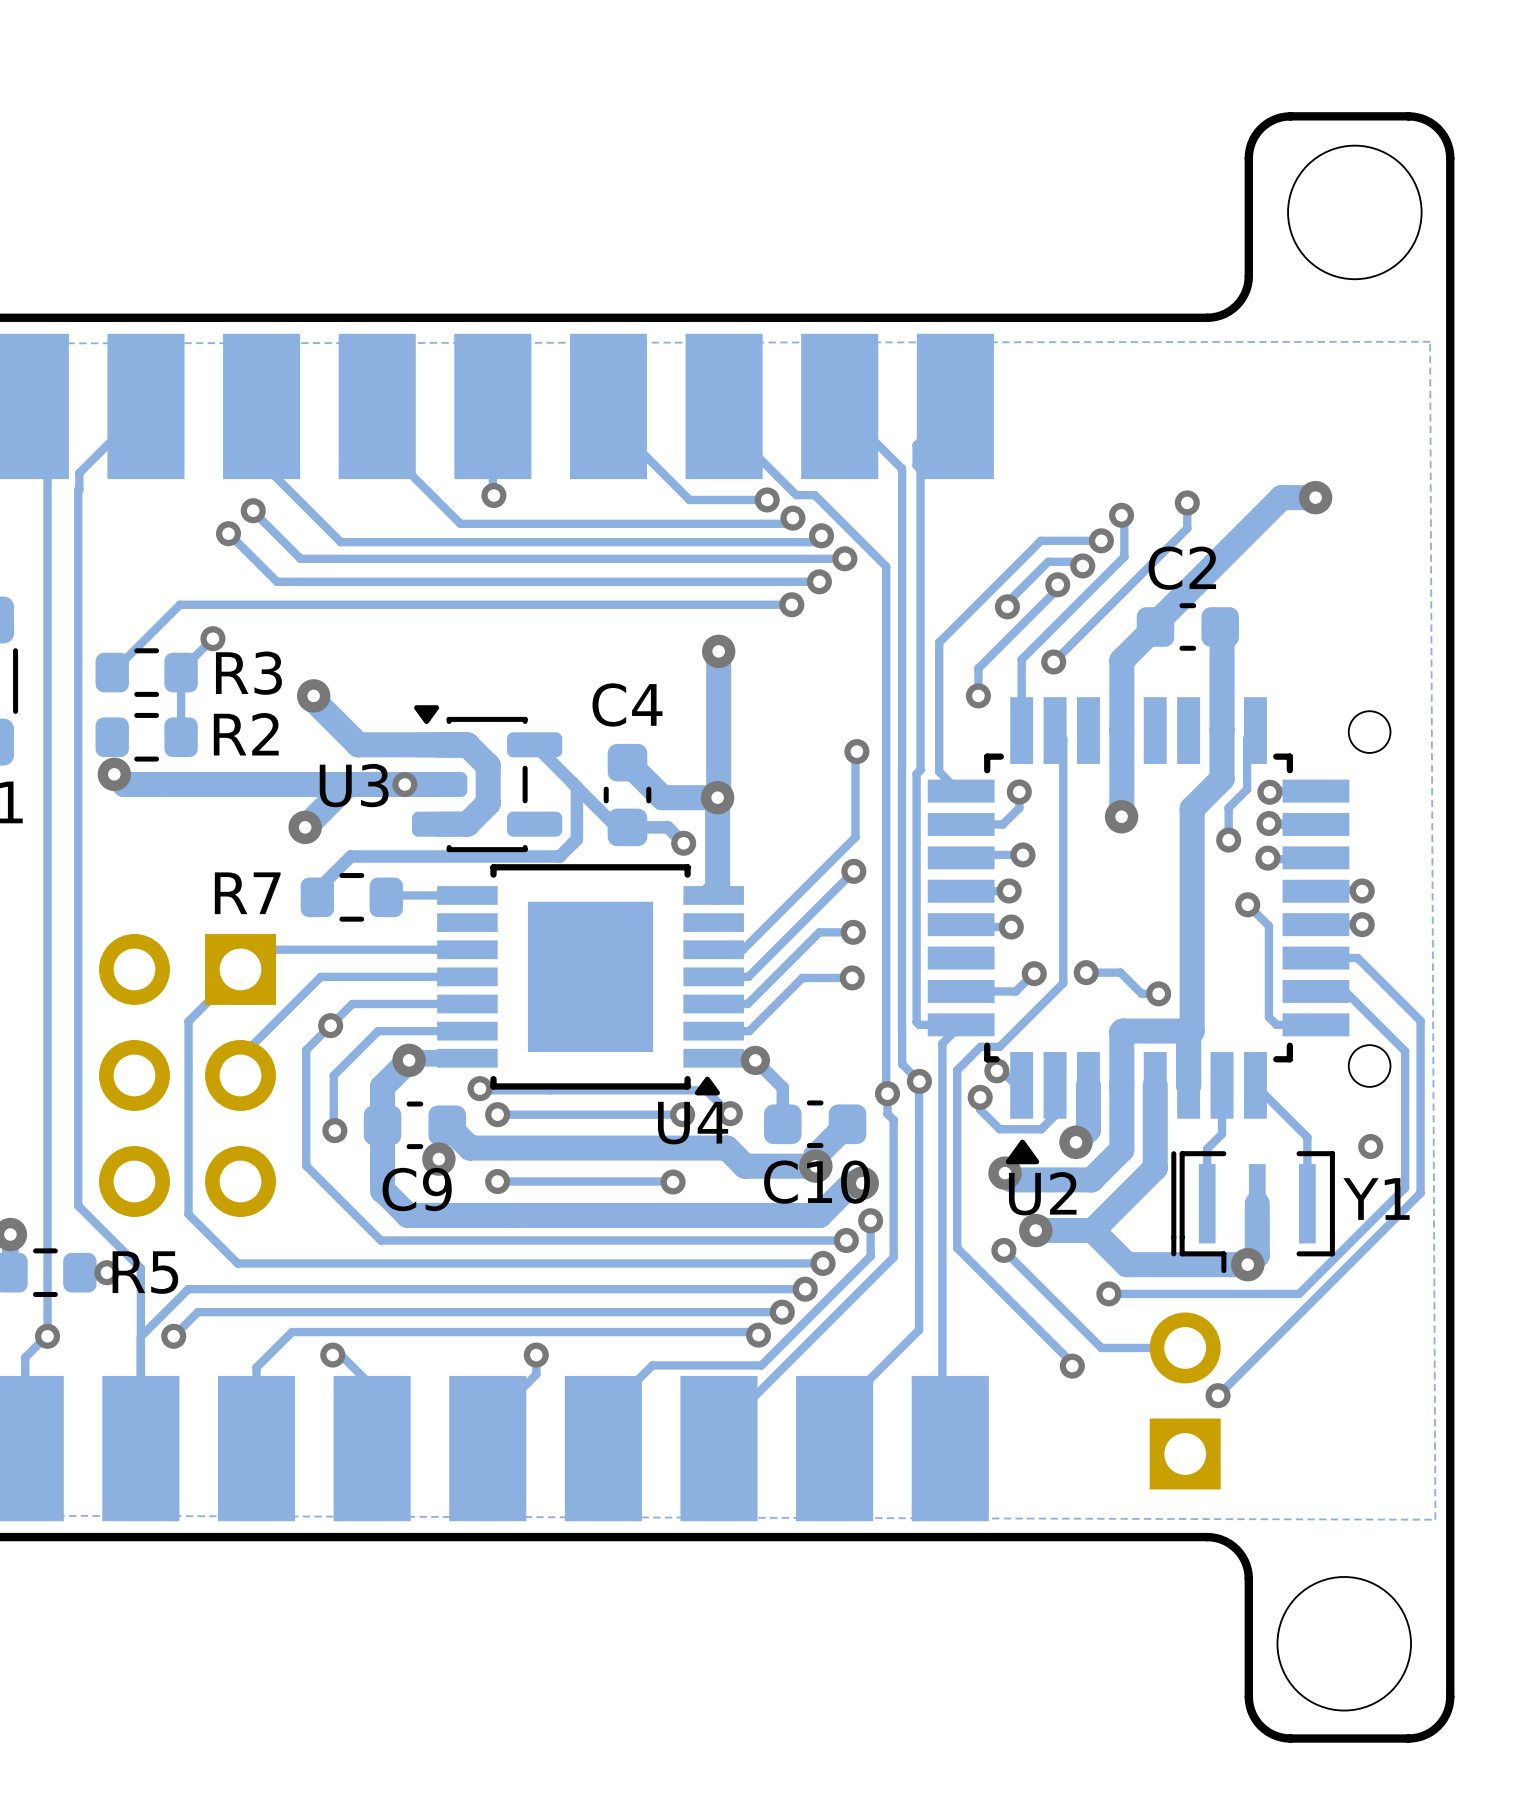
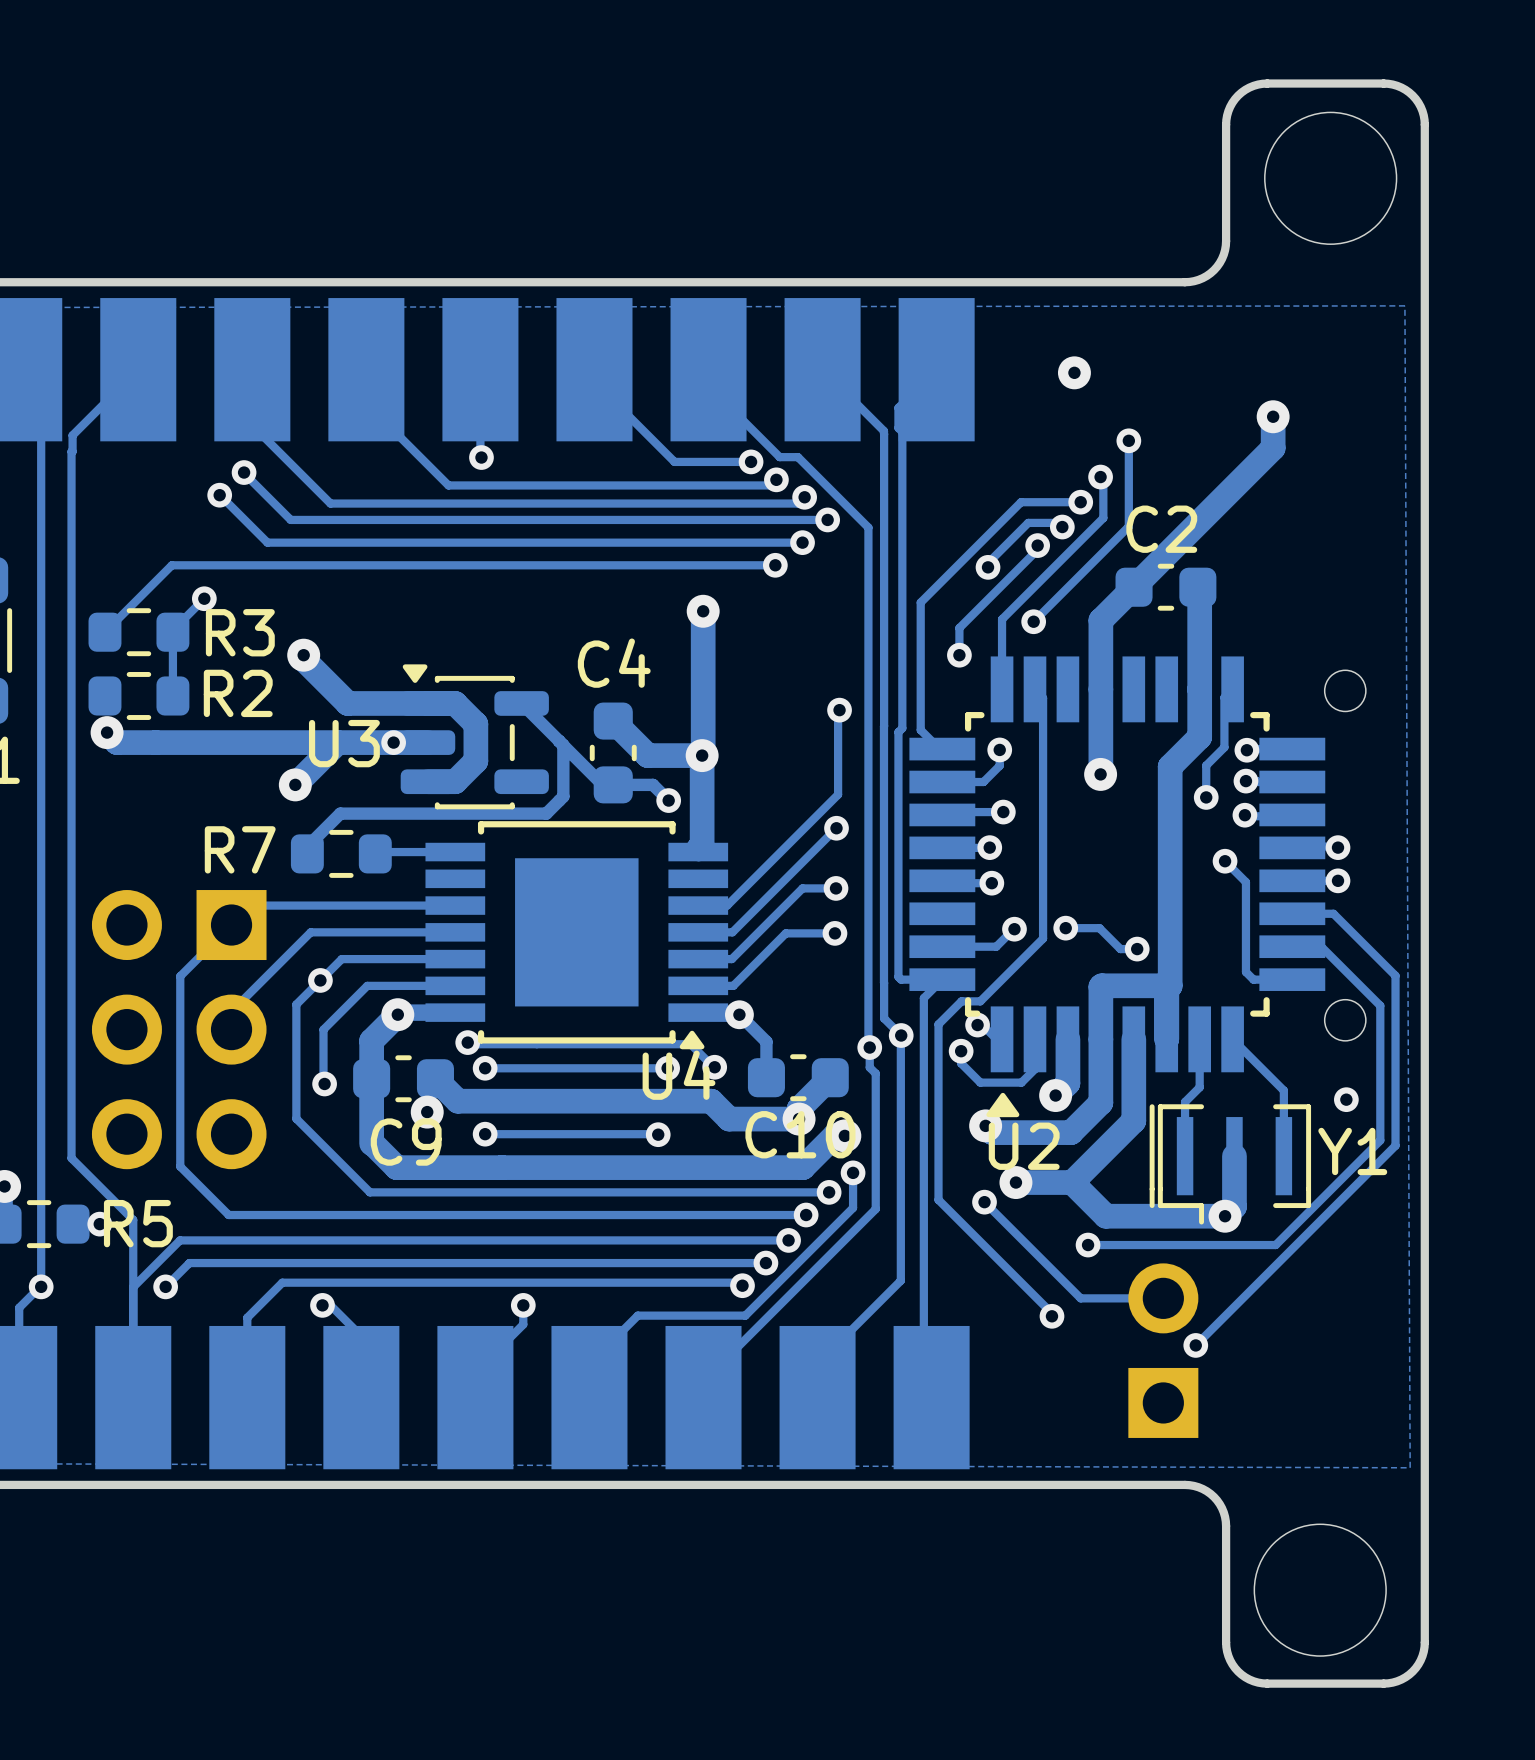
via: none -> (1074, 372)
track: (1315, 497) (1281, 497) (1155, 623) (1155, 626) -> (1273, 416) (1273, 448) (1134, 587)
via position: (1315, 497) -> (1273, 416)
track: (1187, 502) (1187, 528) (1150, 565) -> (1128, 440) (1128, 526)
via position: (1187, 502) -> (1128, 440)

